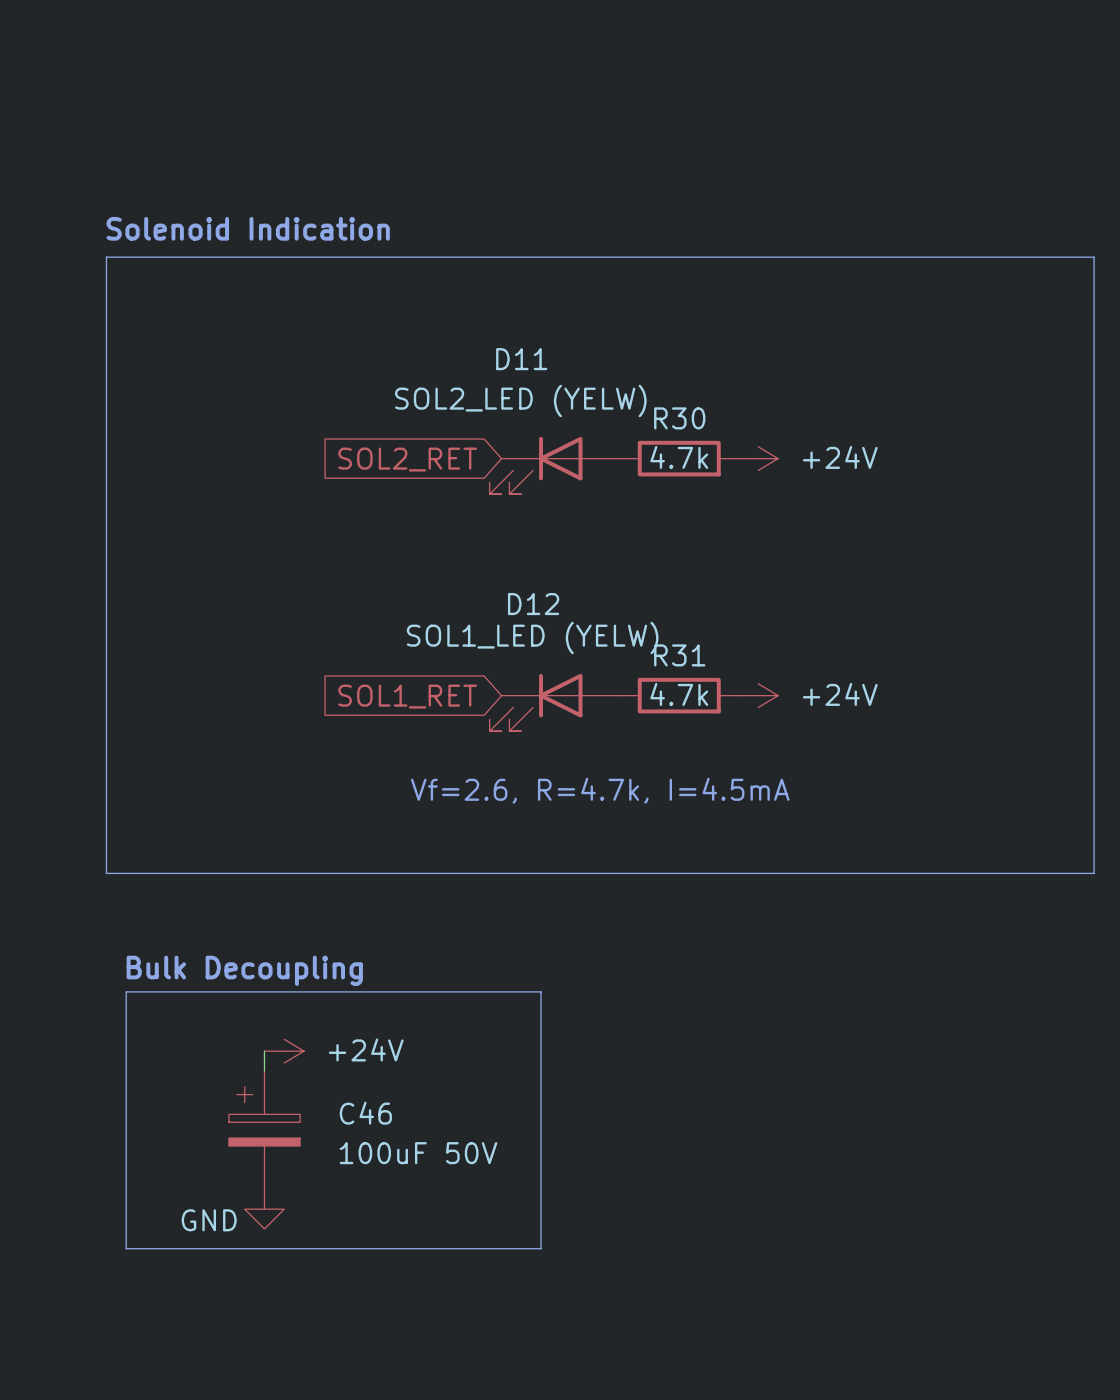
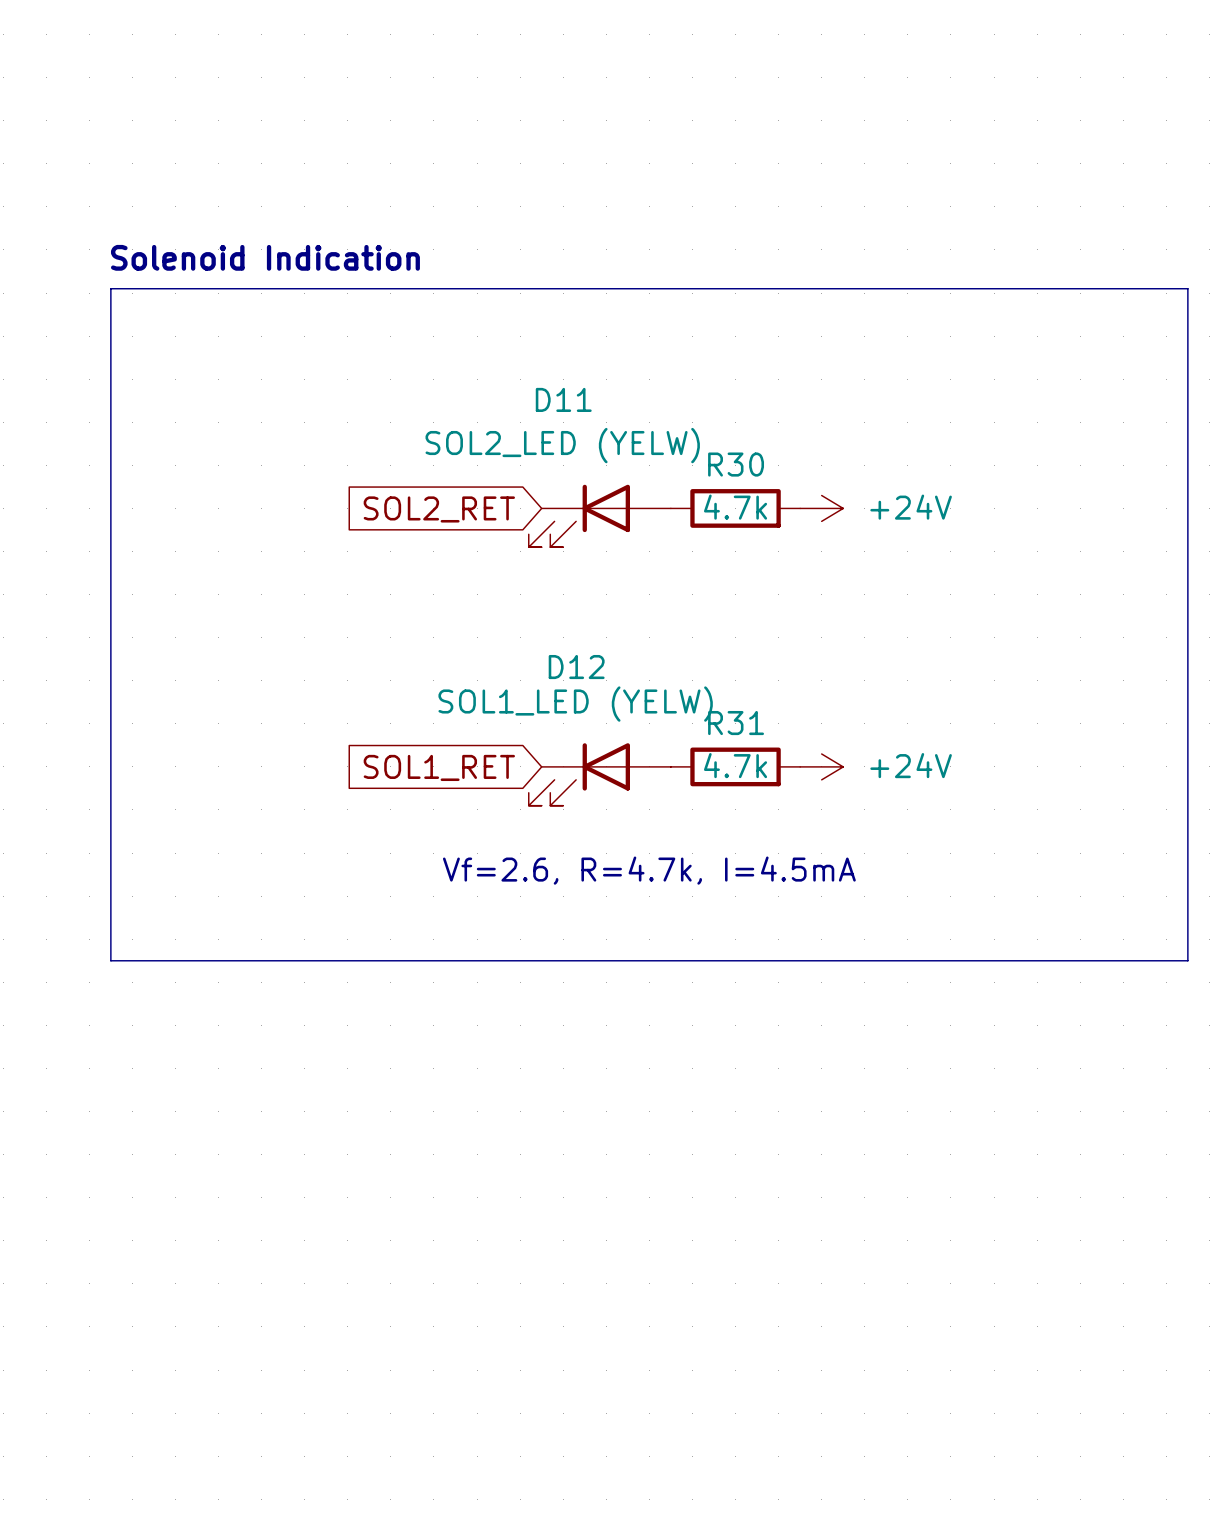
text: Bulk Decoupling (244, 970) -> none
line: (126, 991) (541, 991) (541, 1248) (126, 1248) (126, 991) -> none
wire: (264, 1051) (264, 1070) -> none
power symbol: +24V (284, 1051) -> none
C46: 100uF 50V (264, 1130) -> none
power symbol: GND (264, 1209) -> none

